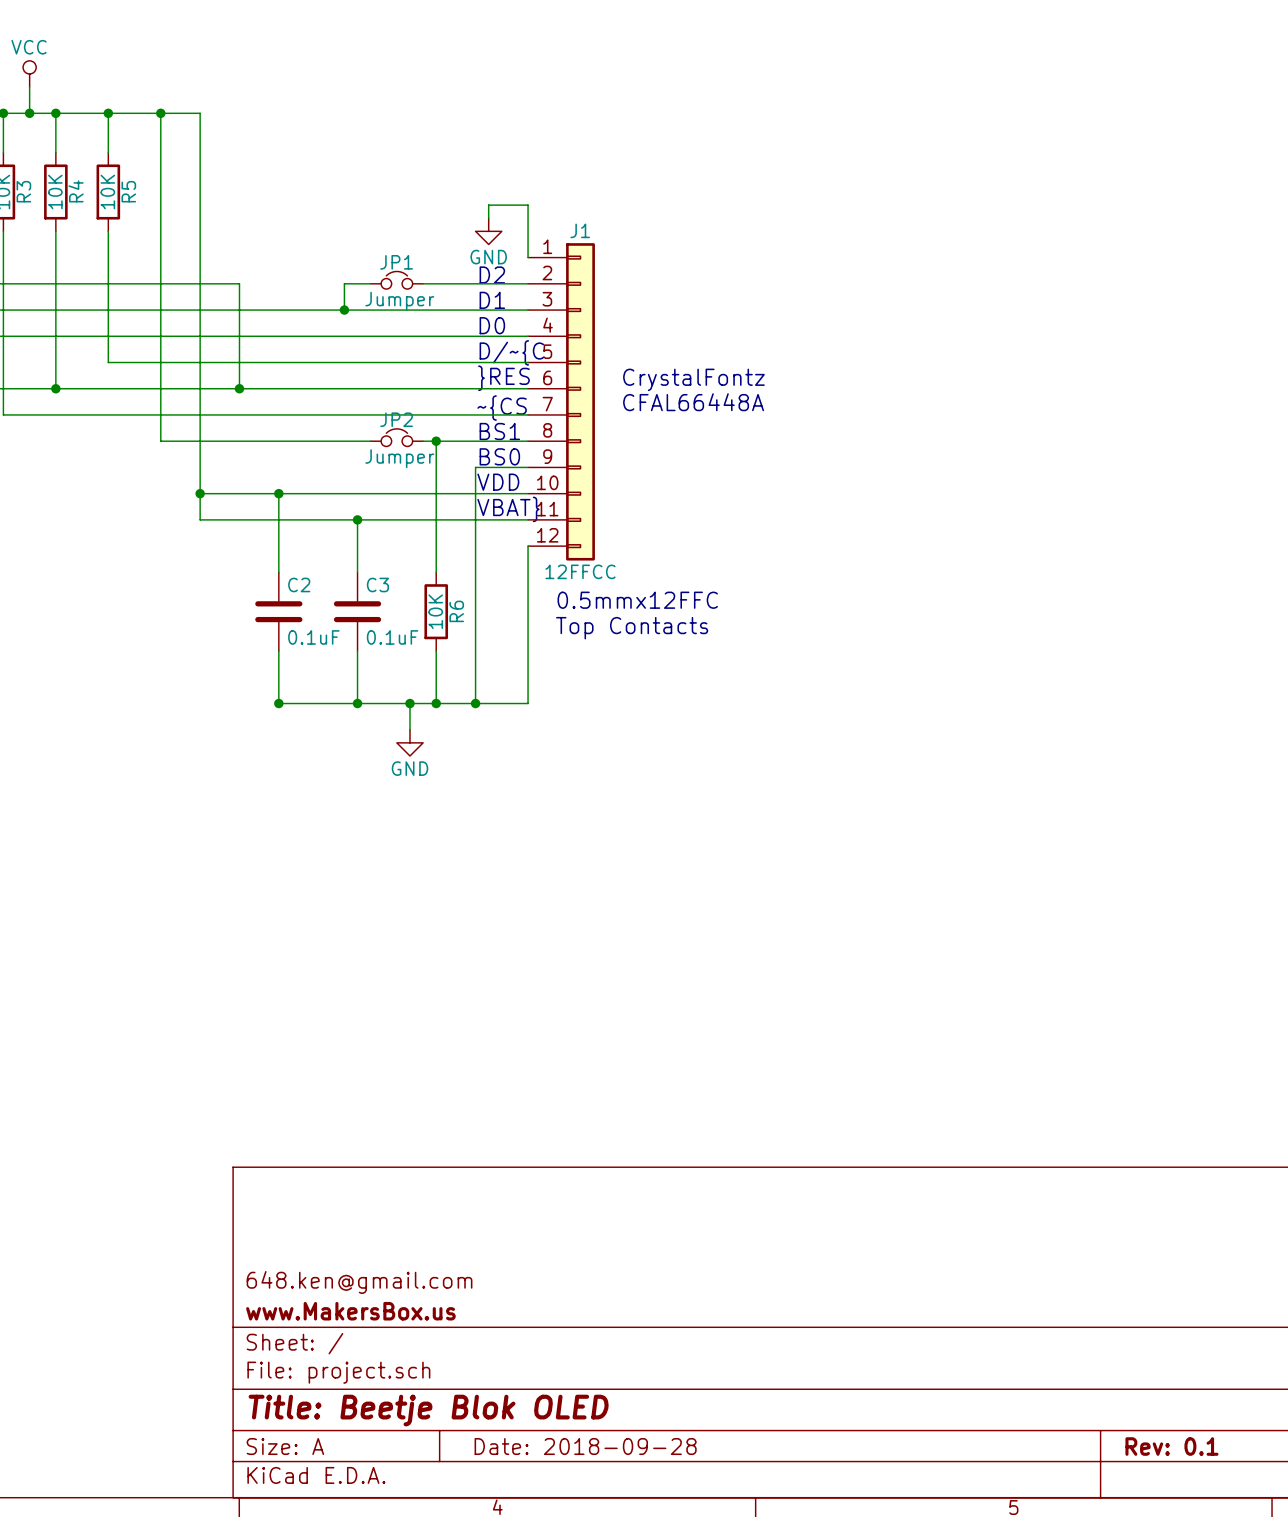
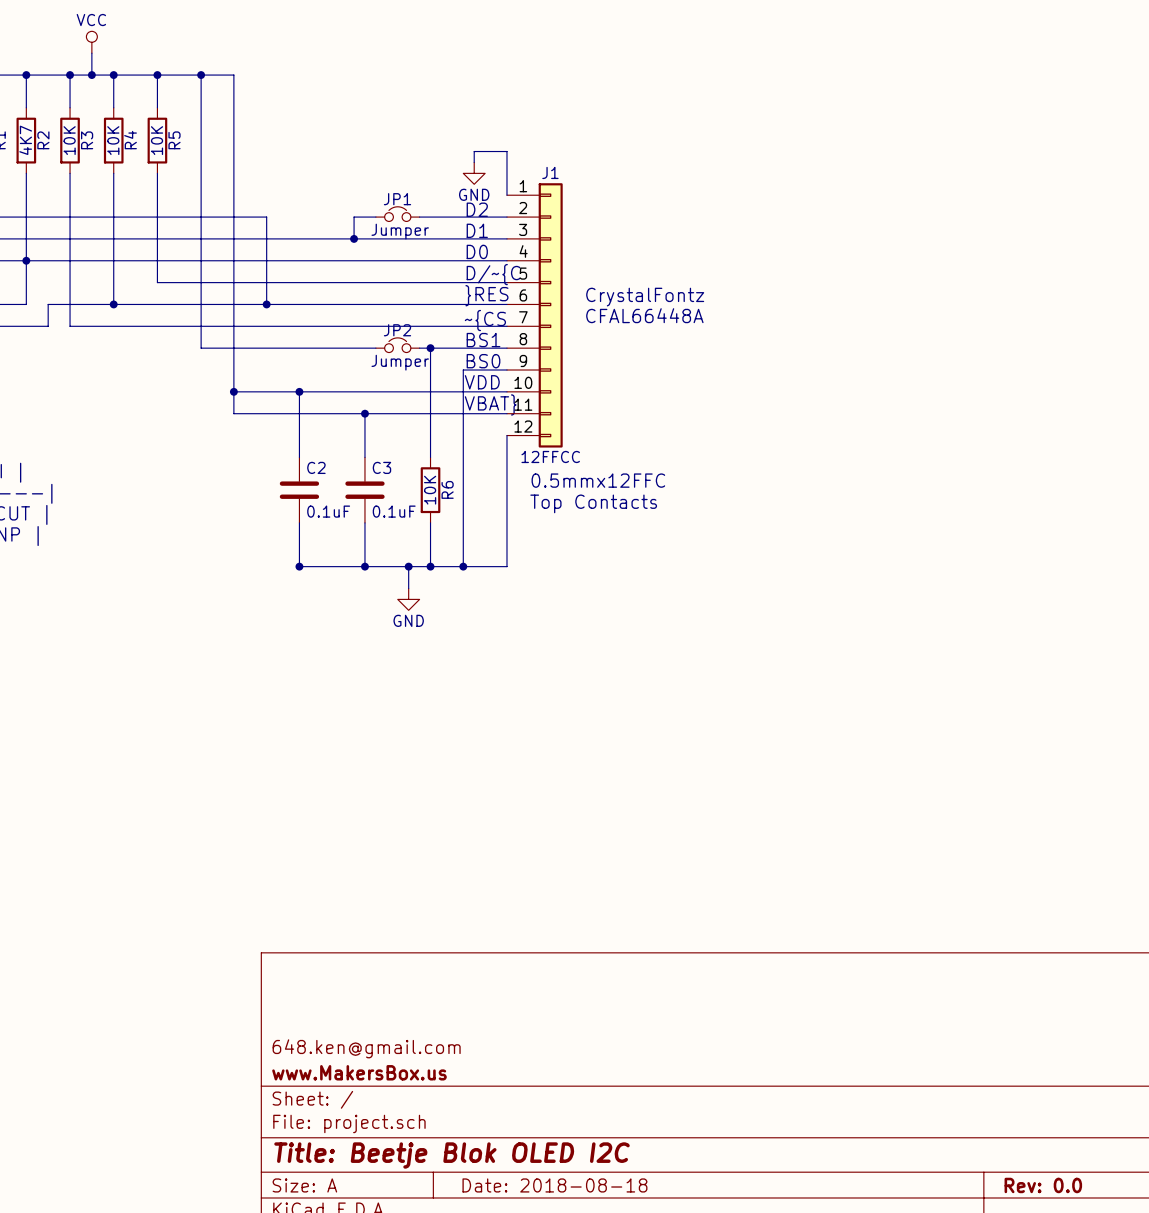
title block: Title: Beetje Blok OLED (428, 1410) -> Title: Beetje Blok OLED I2C (452, 1155)
title block: Date: 2018-09-28 (585, 1446) -> Date: 2018-08-18 (554, 1185)
title block: Rev: 0.1 (1171, 1446) -> Rev: 0.0 (1043, 1185)

